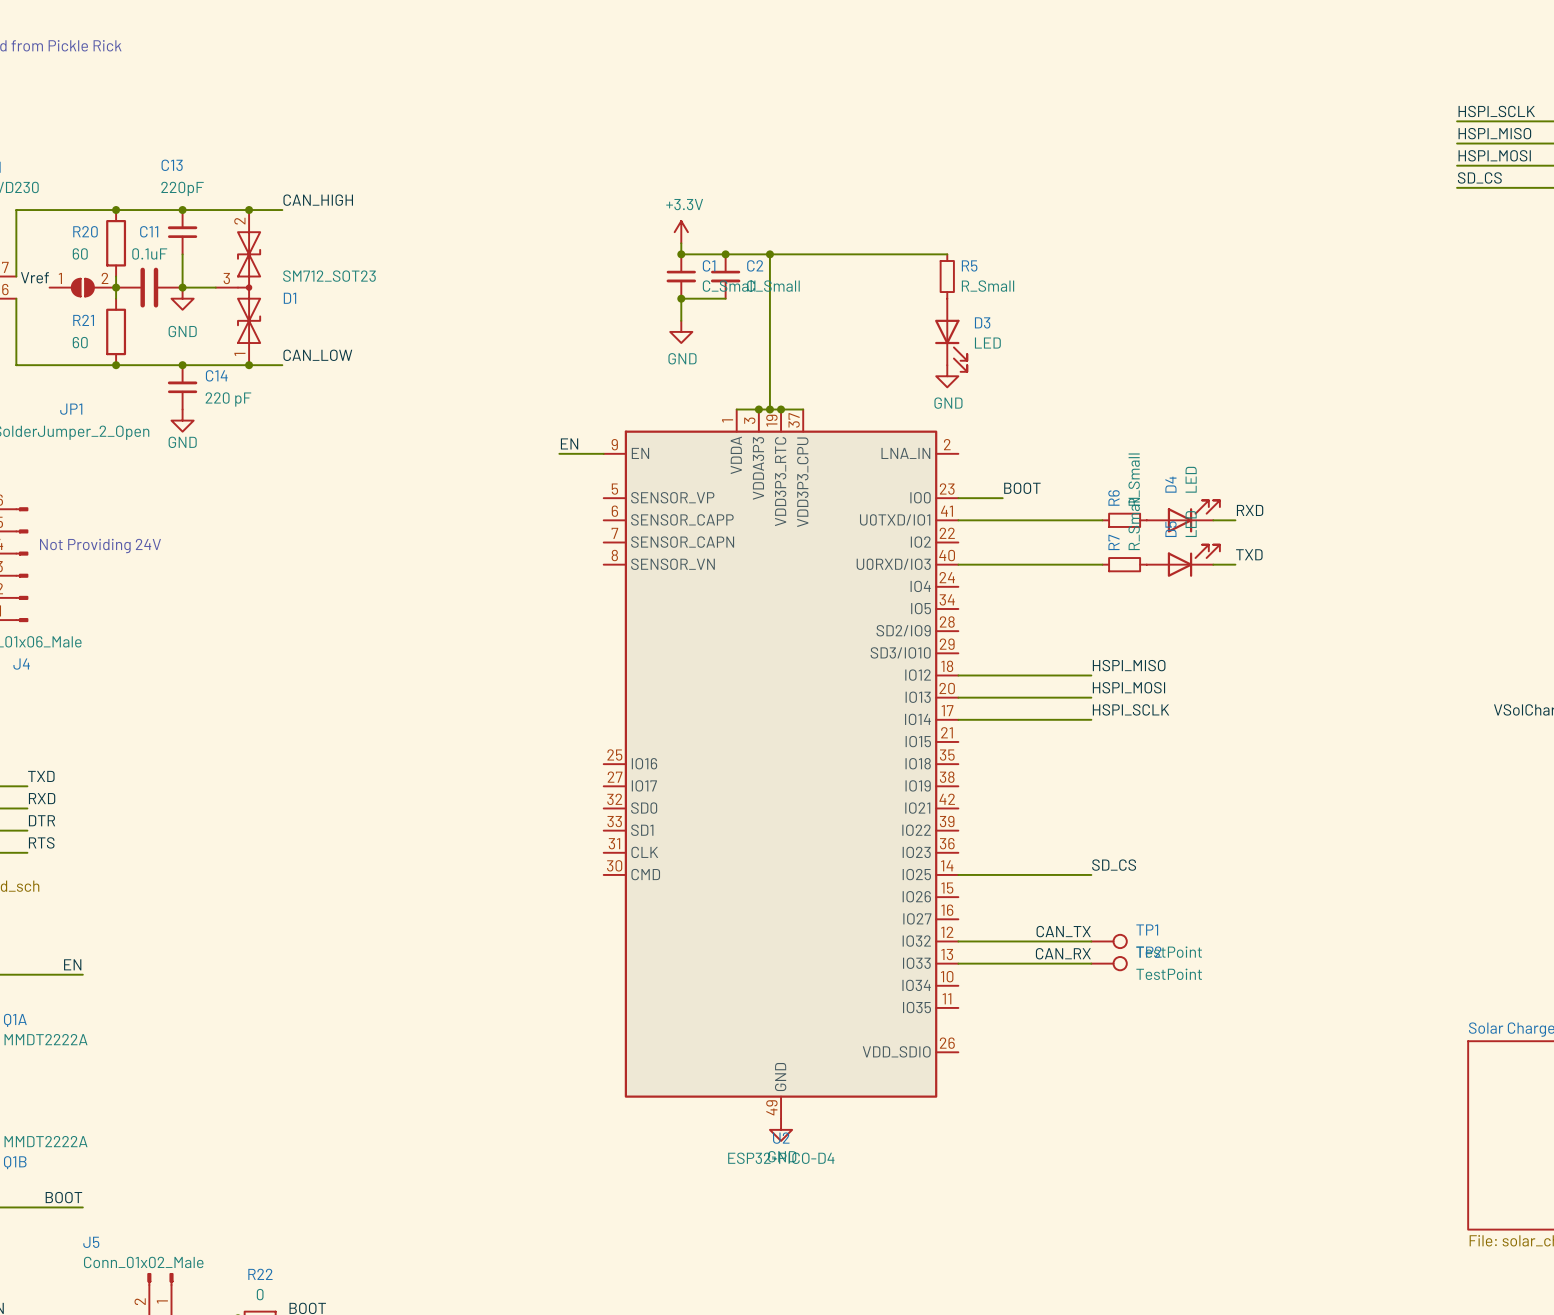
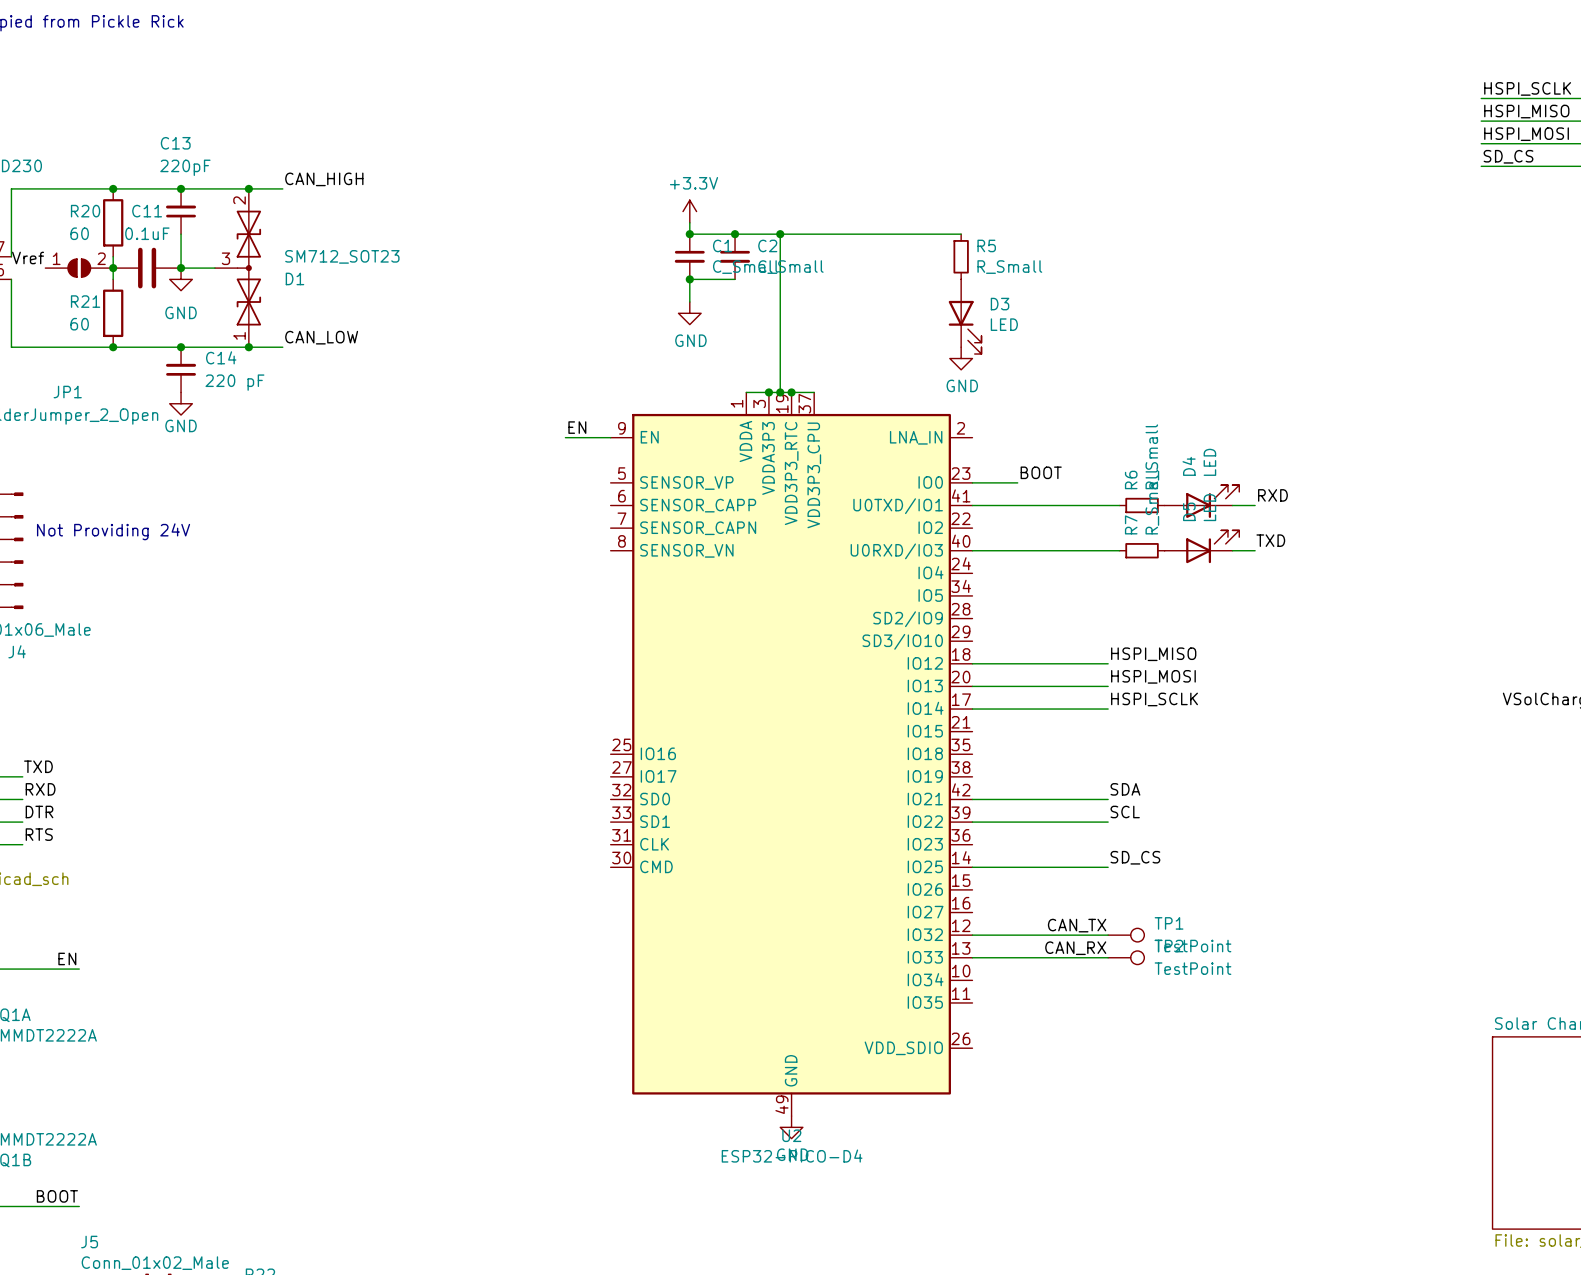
label: none -> SDA (1125, 789)
wire: none -> (972, 799) (1108, 799)
label: none -> SCL (1125, 811)
wire: none -> (972, 822) (1108, 822)

